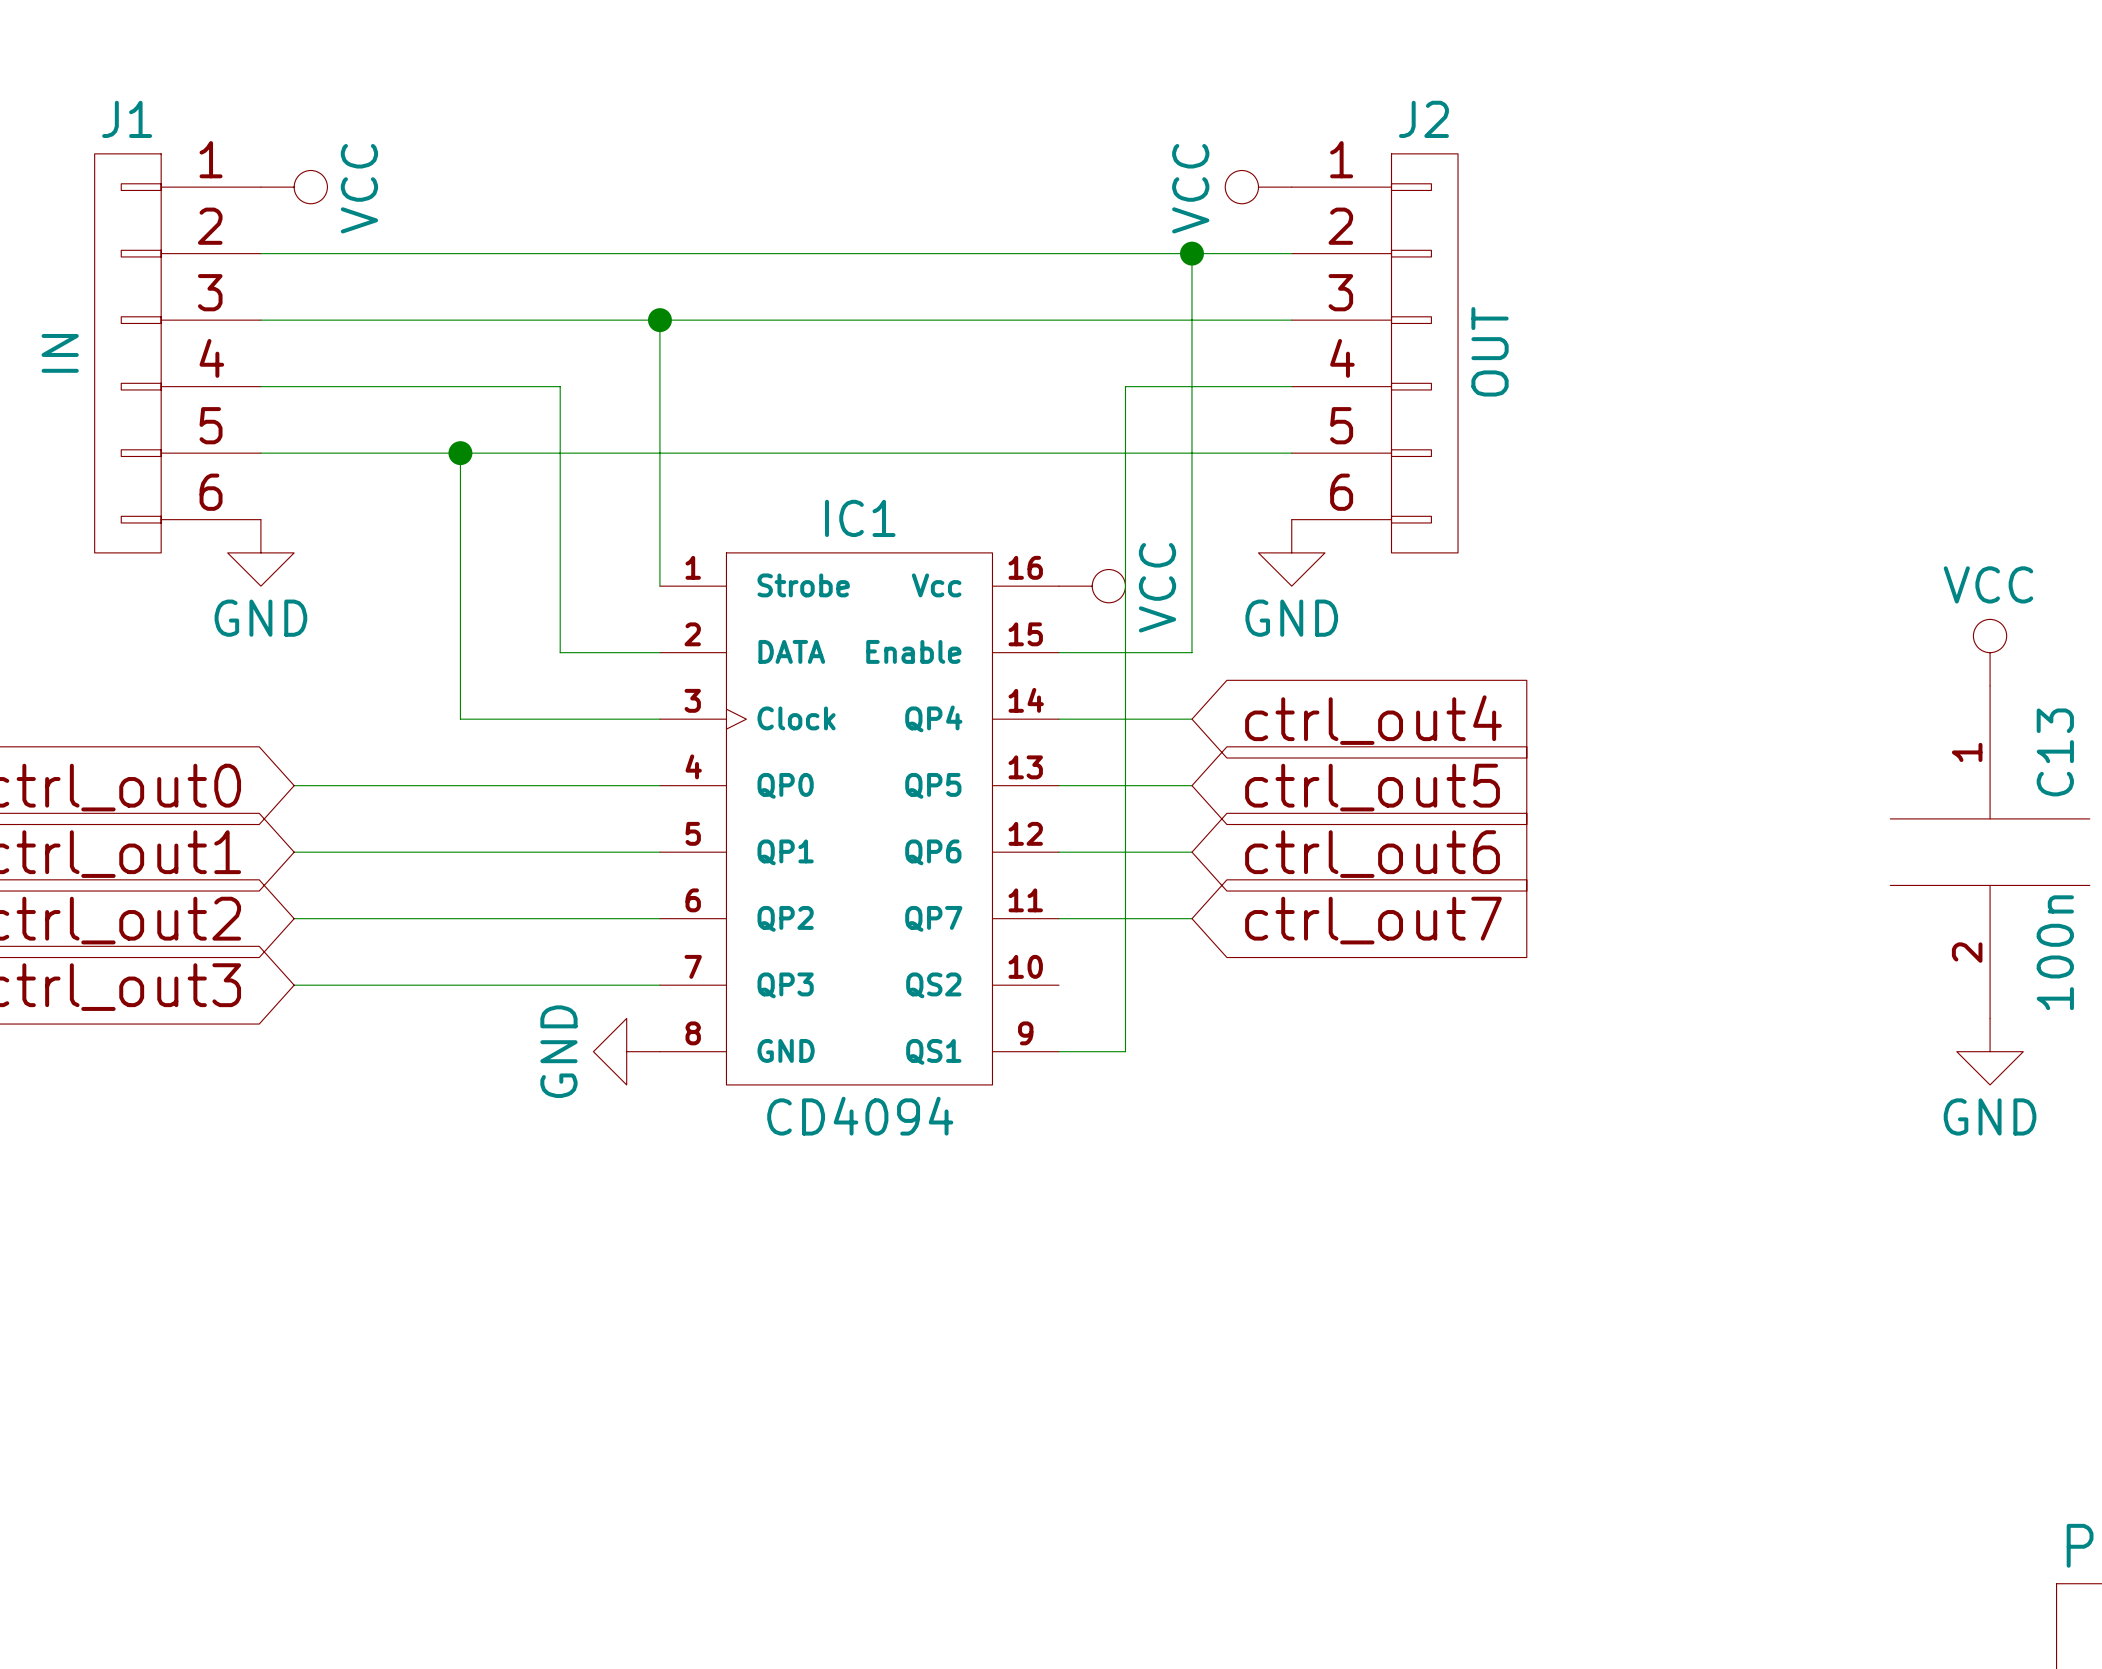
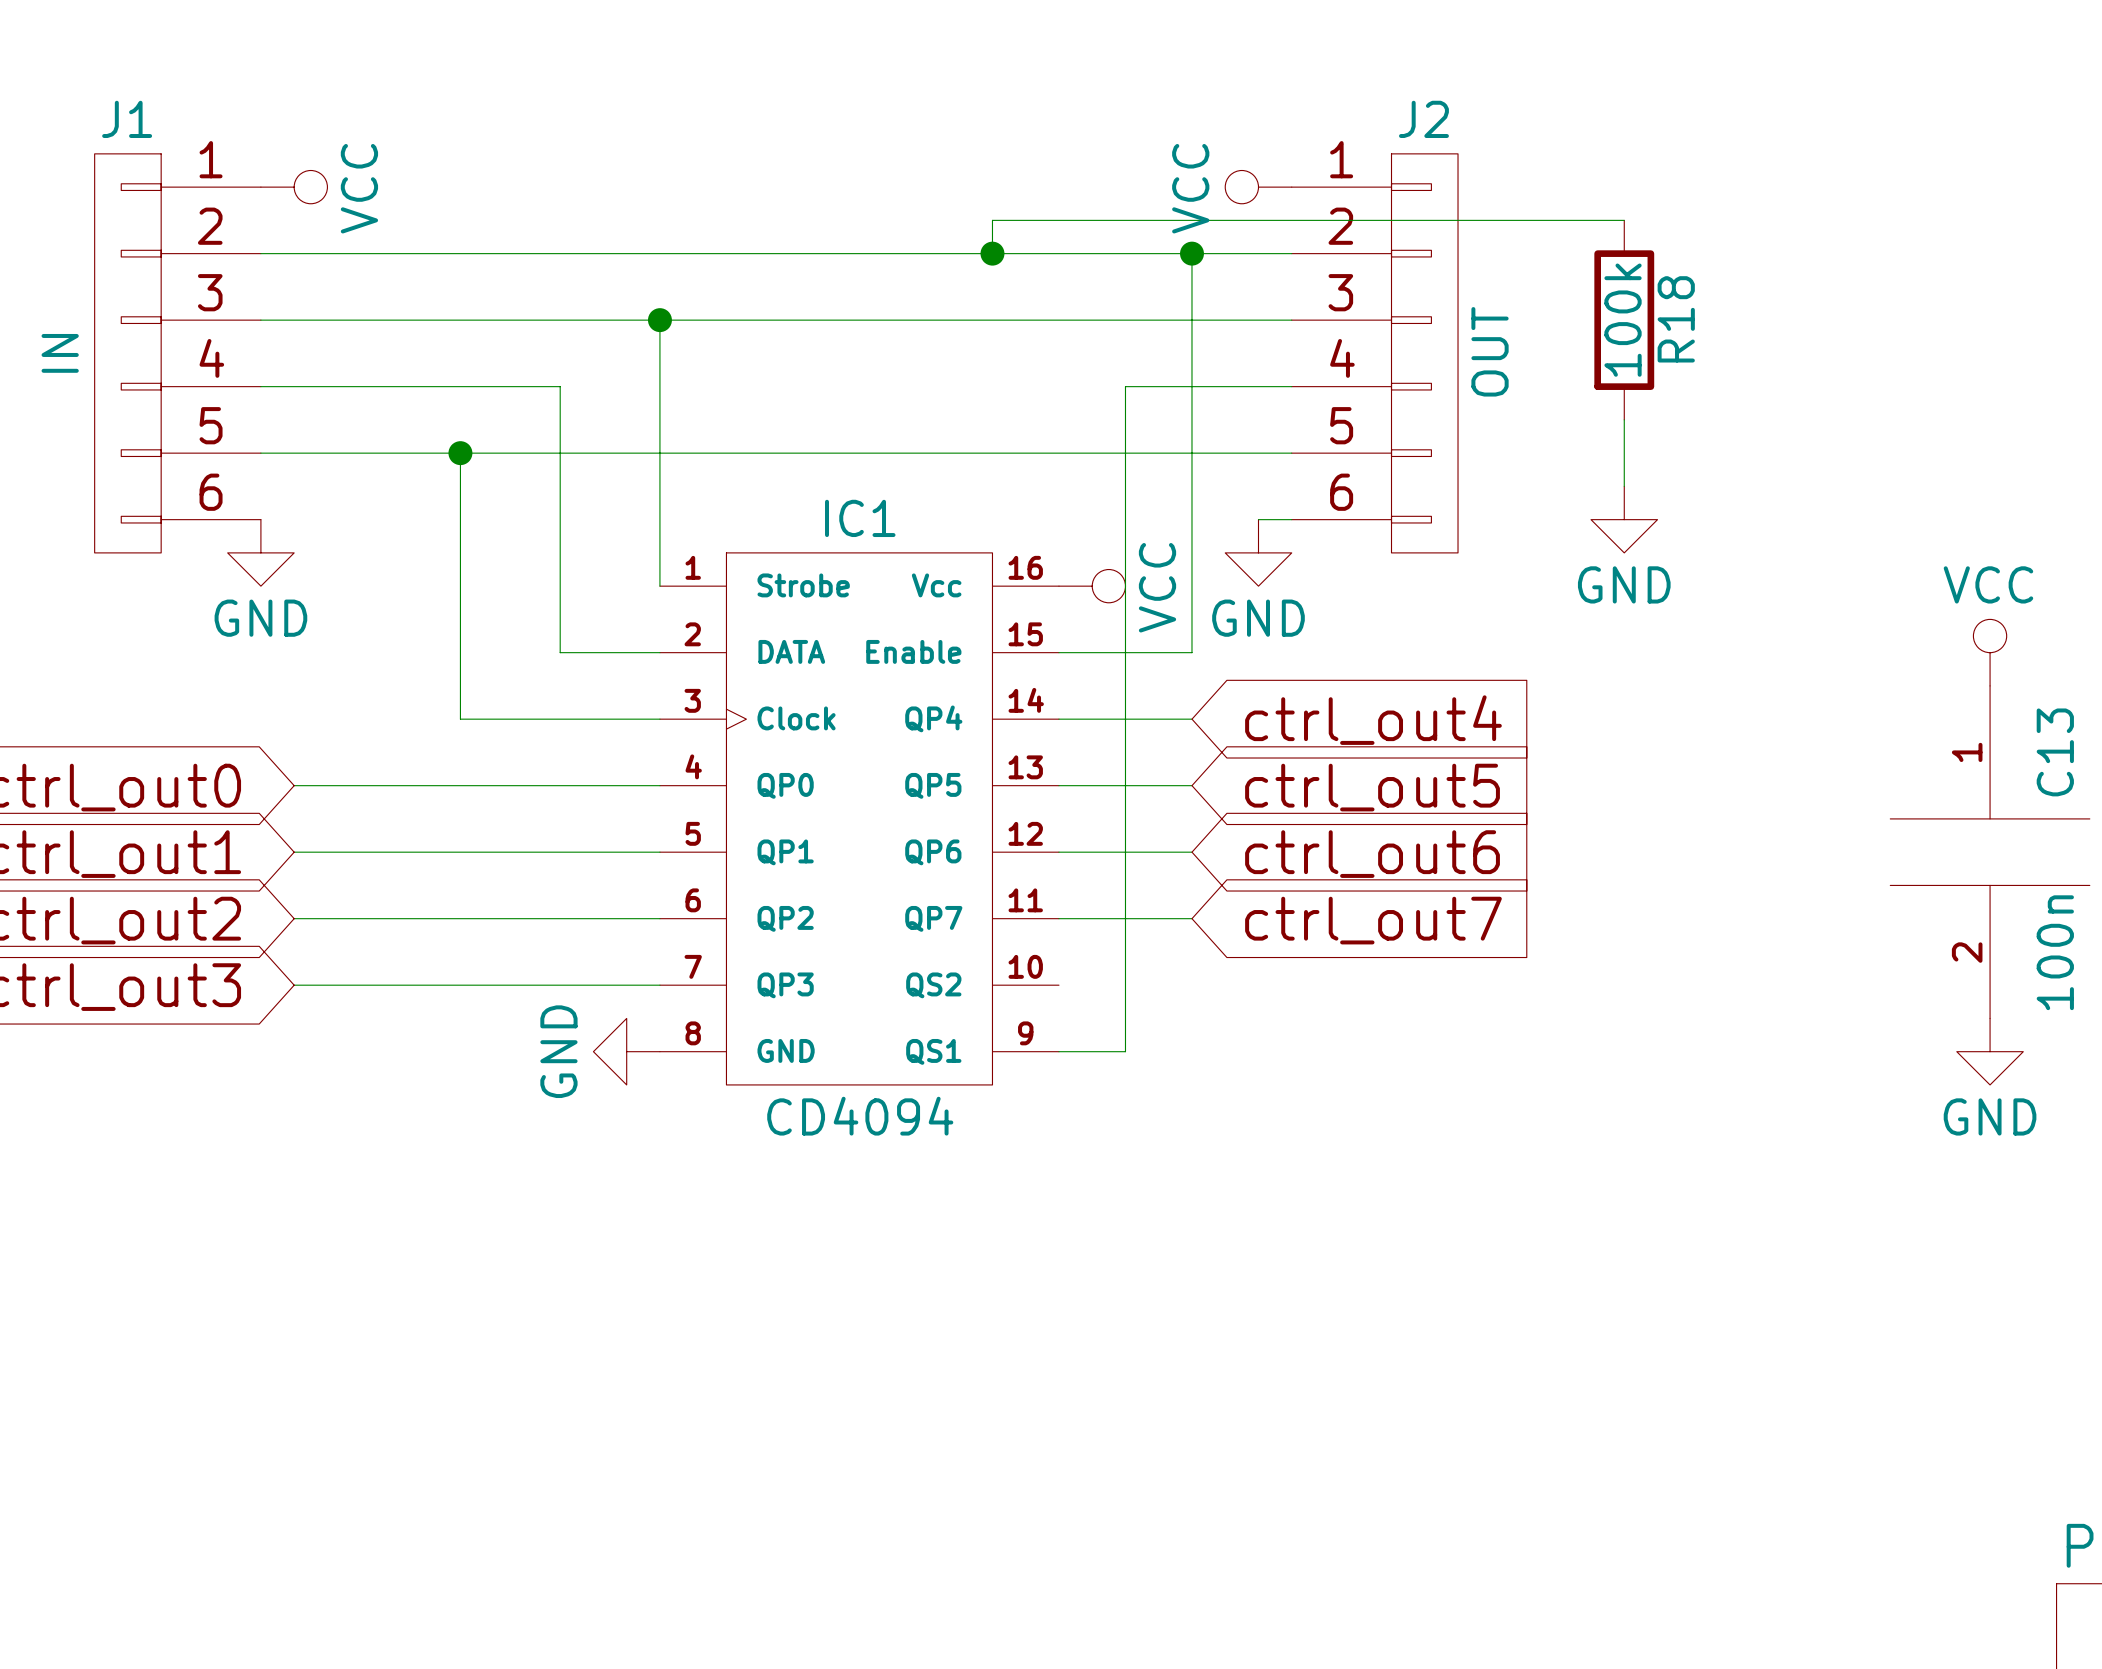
wire: none -> (1624, 220) (992, 220) (992, 253)
junction: none -> (992, 253)
R18: none -> 100k (1624, 320)
wire: none -> (1624, 419) (1624, 486)
wire: none -> (1258, 519) (1291, 519)
power symbol: none -> GND (1624, 519)
power symbol position: GND (1291, 552) -> GND (1258, 552)

